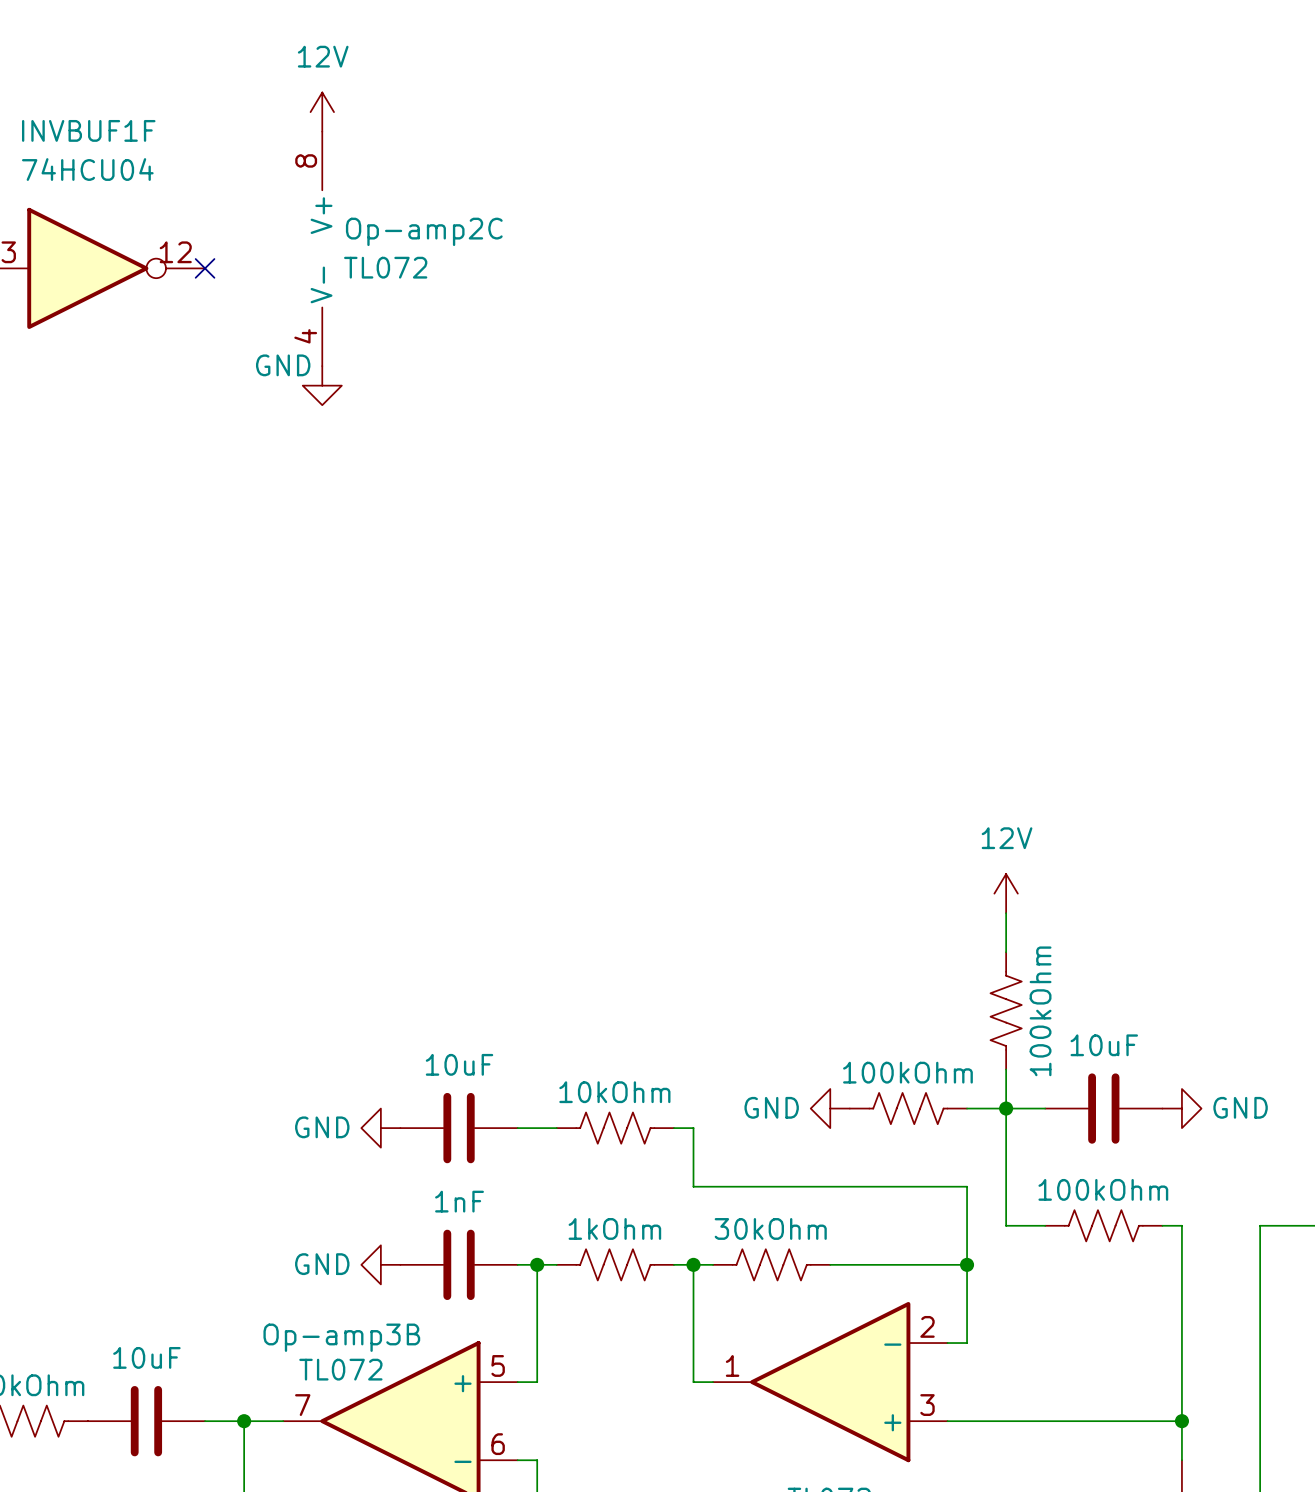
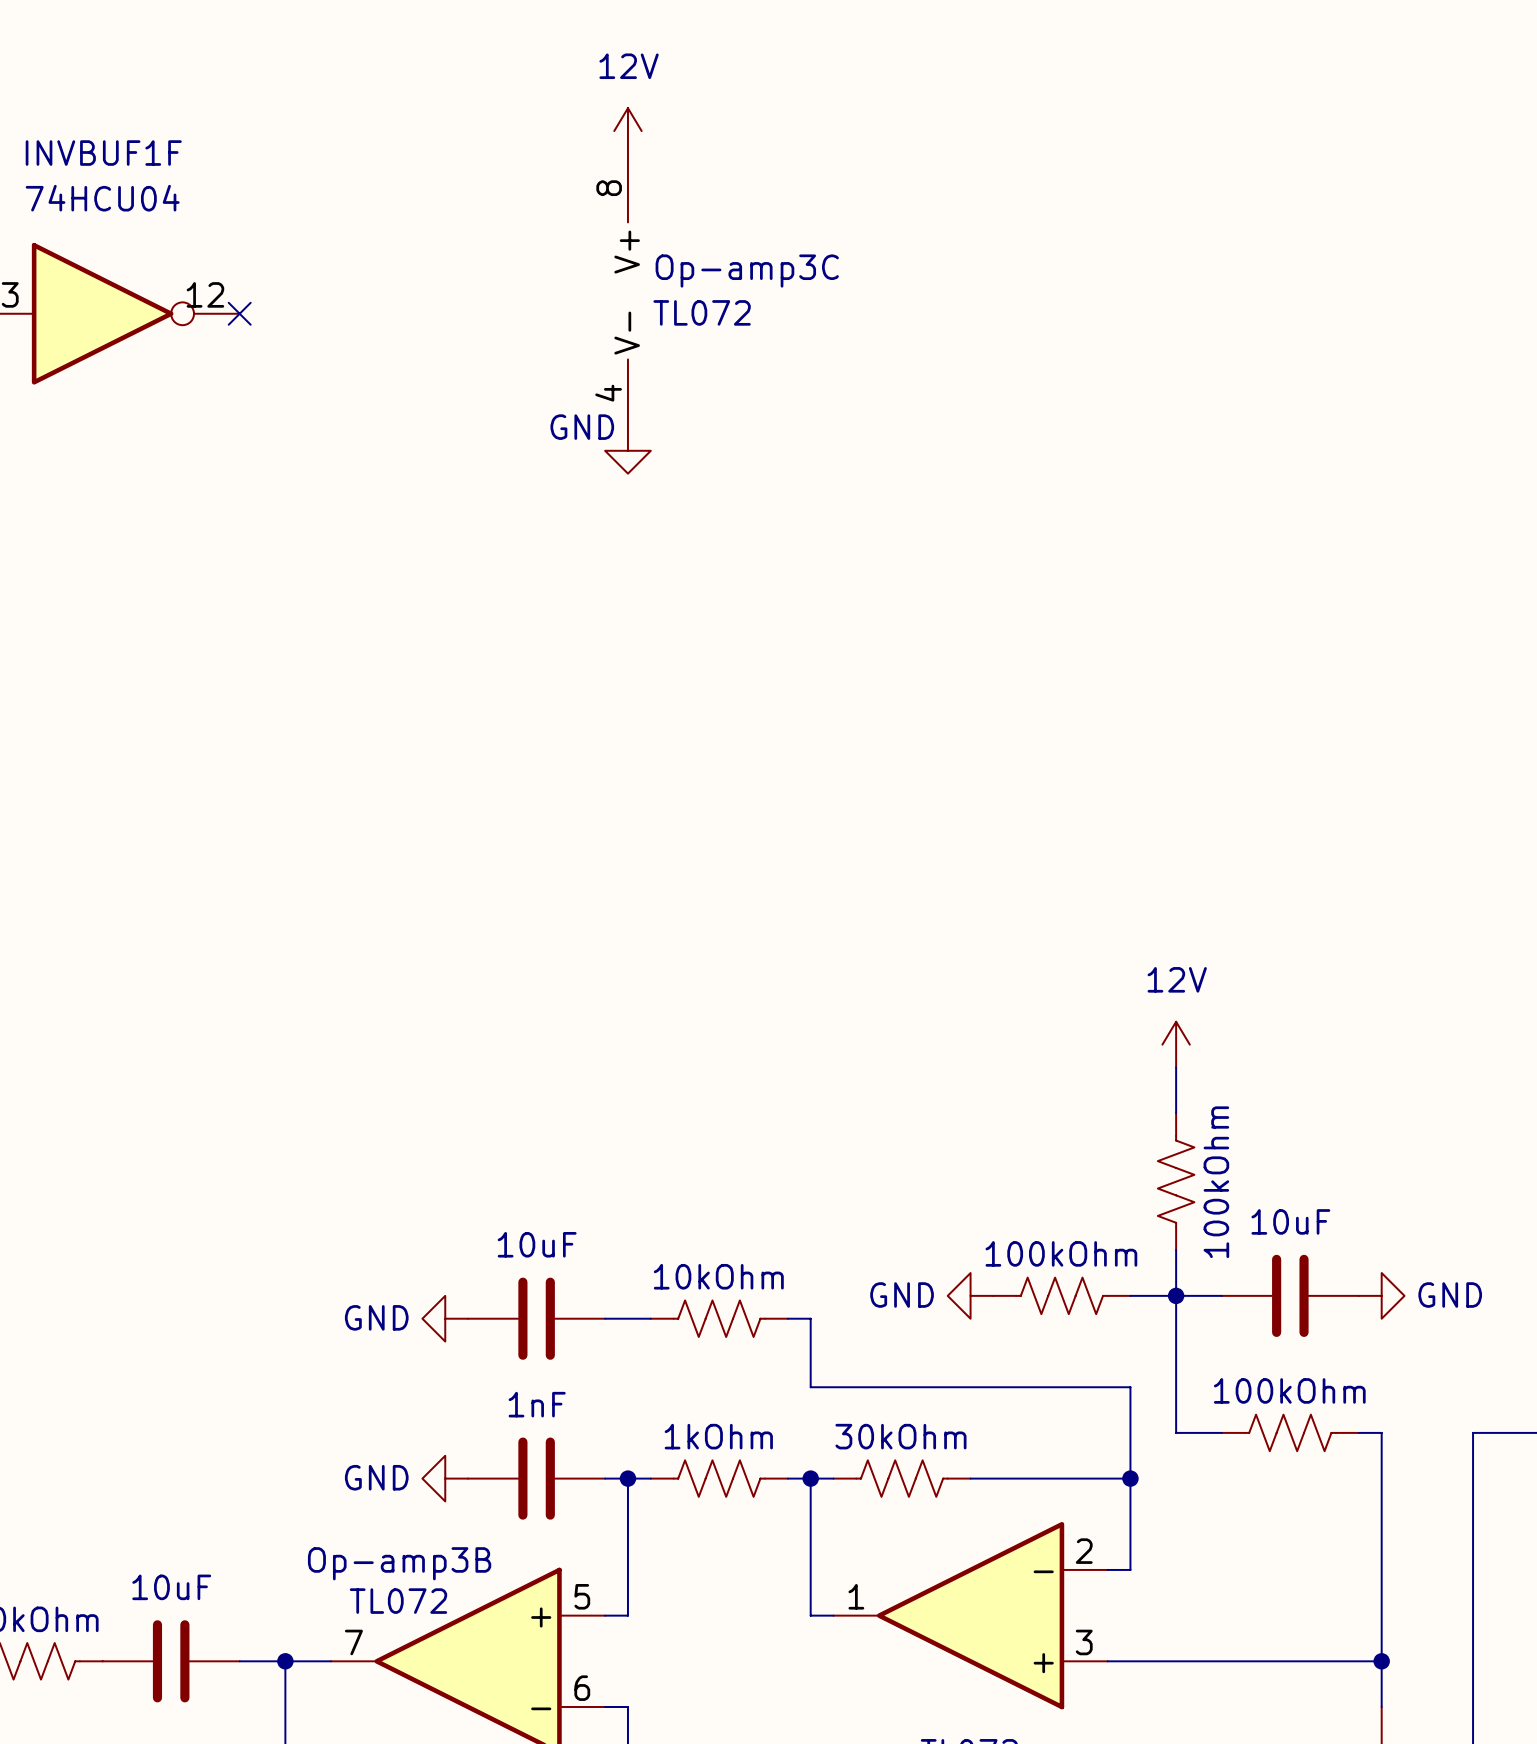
power symbol position: 12V (322, 112) -> 12V (627, 131)
Op-amp2C: TL072 (322, 248) -> none
Op-amp3C: none -> TL072 (627, 290)
power symbol position: GND (322, 385) -> GND (627, 450)

